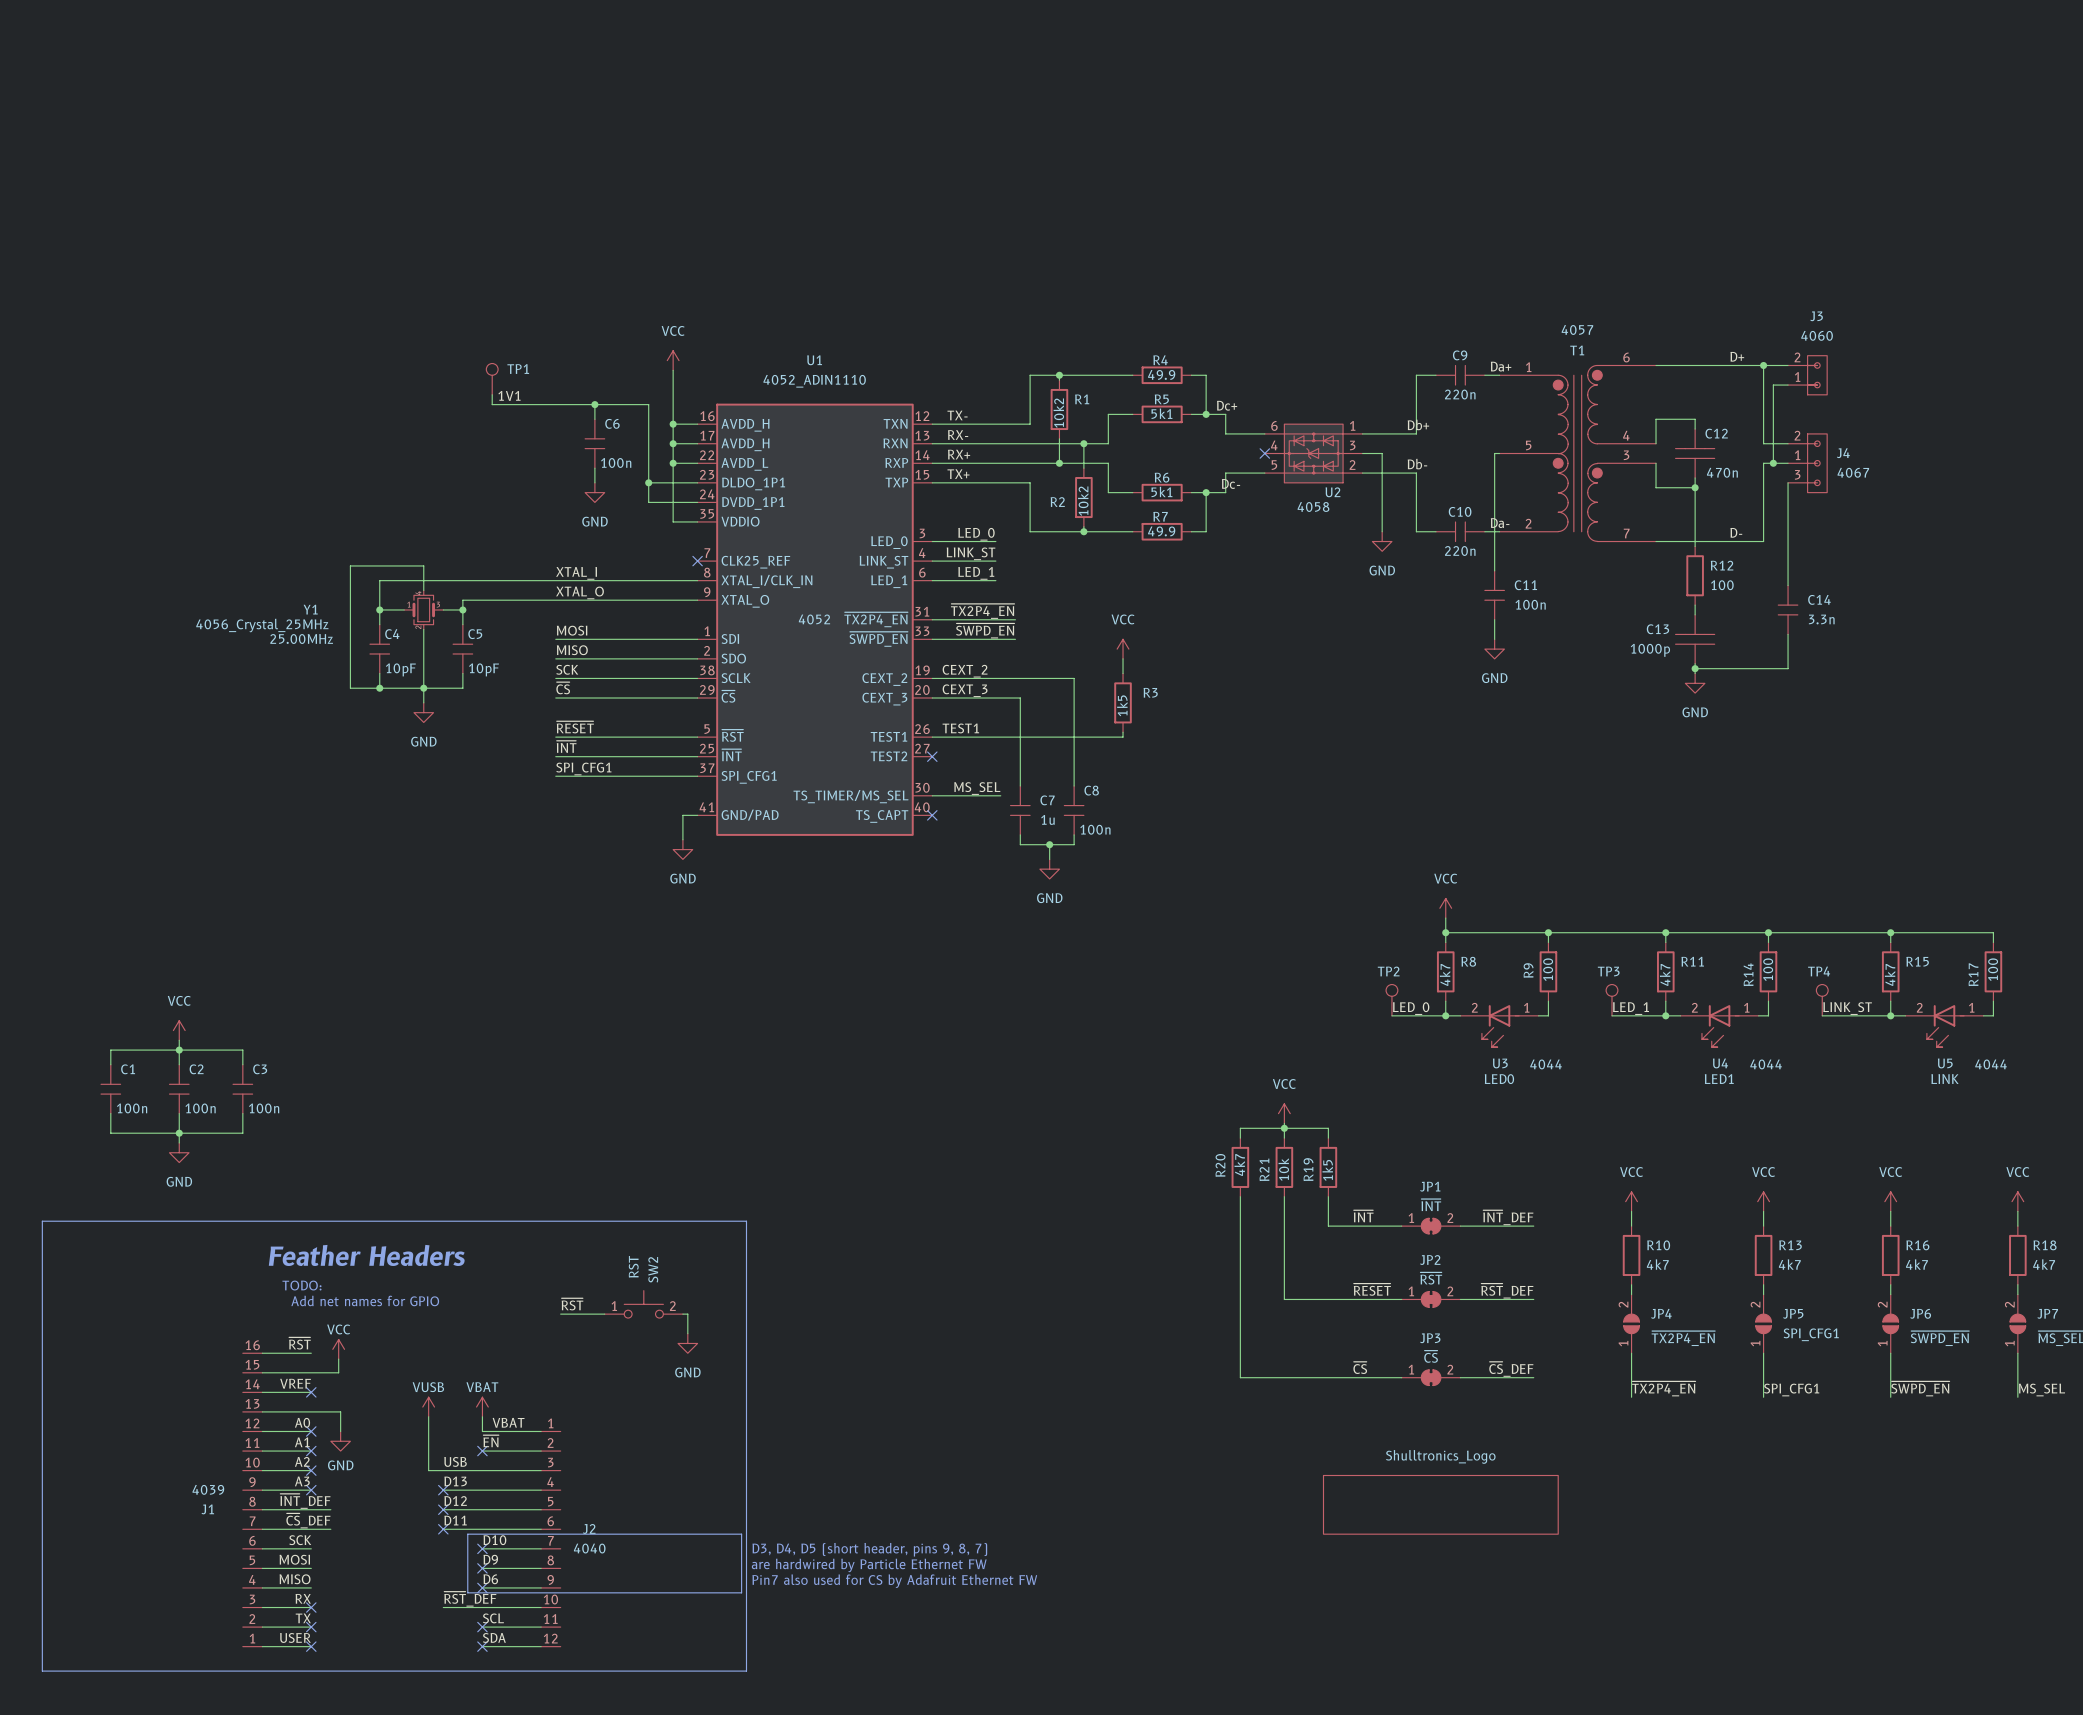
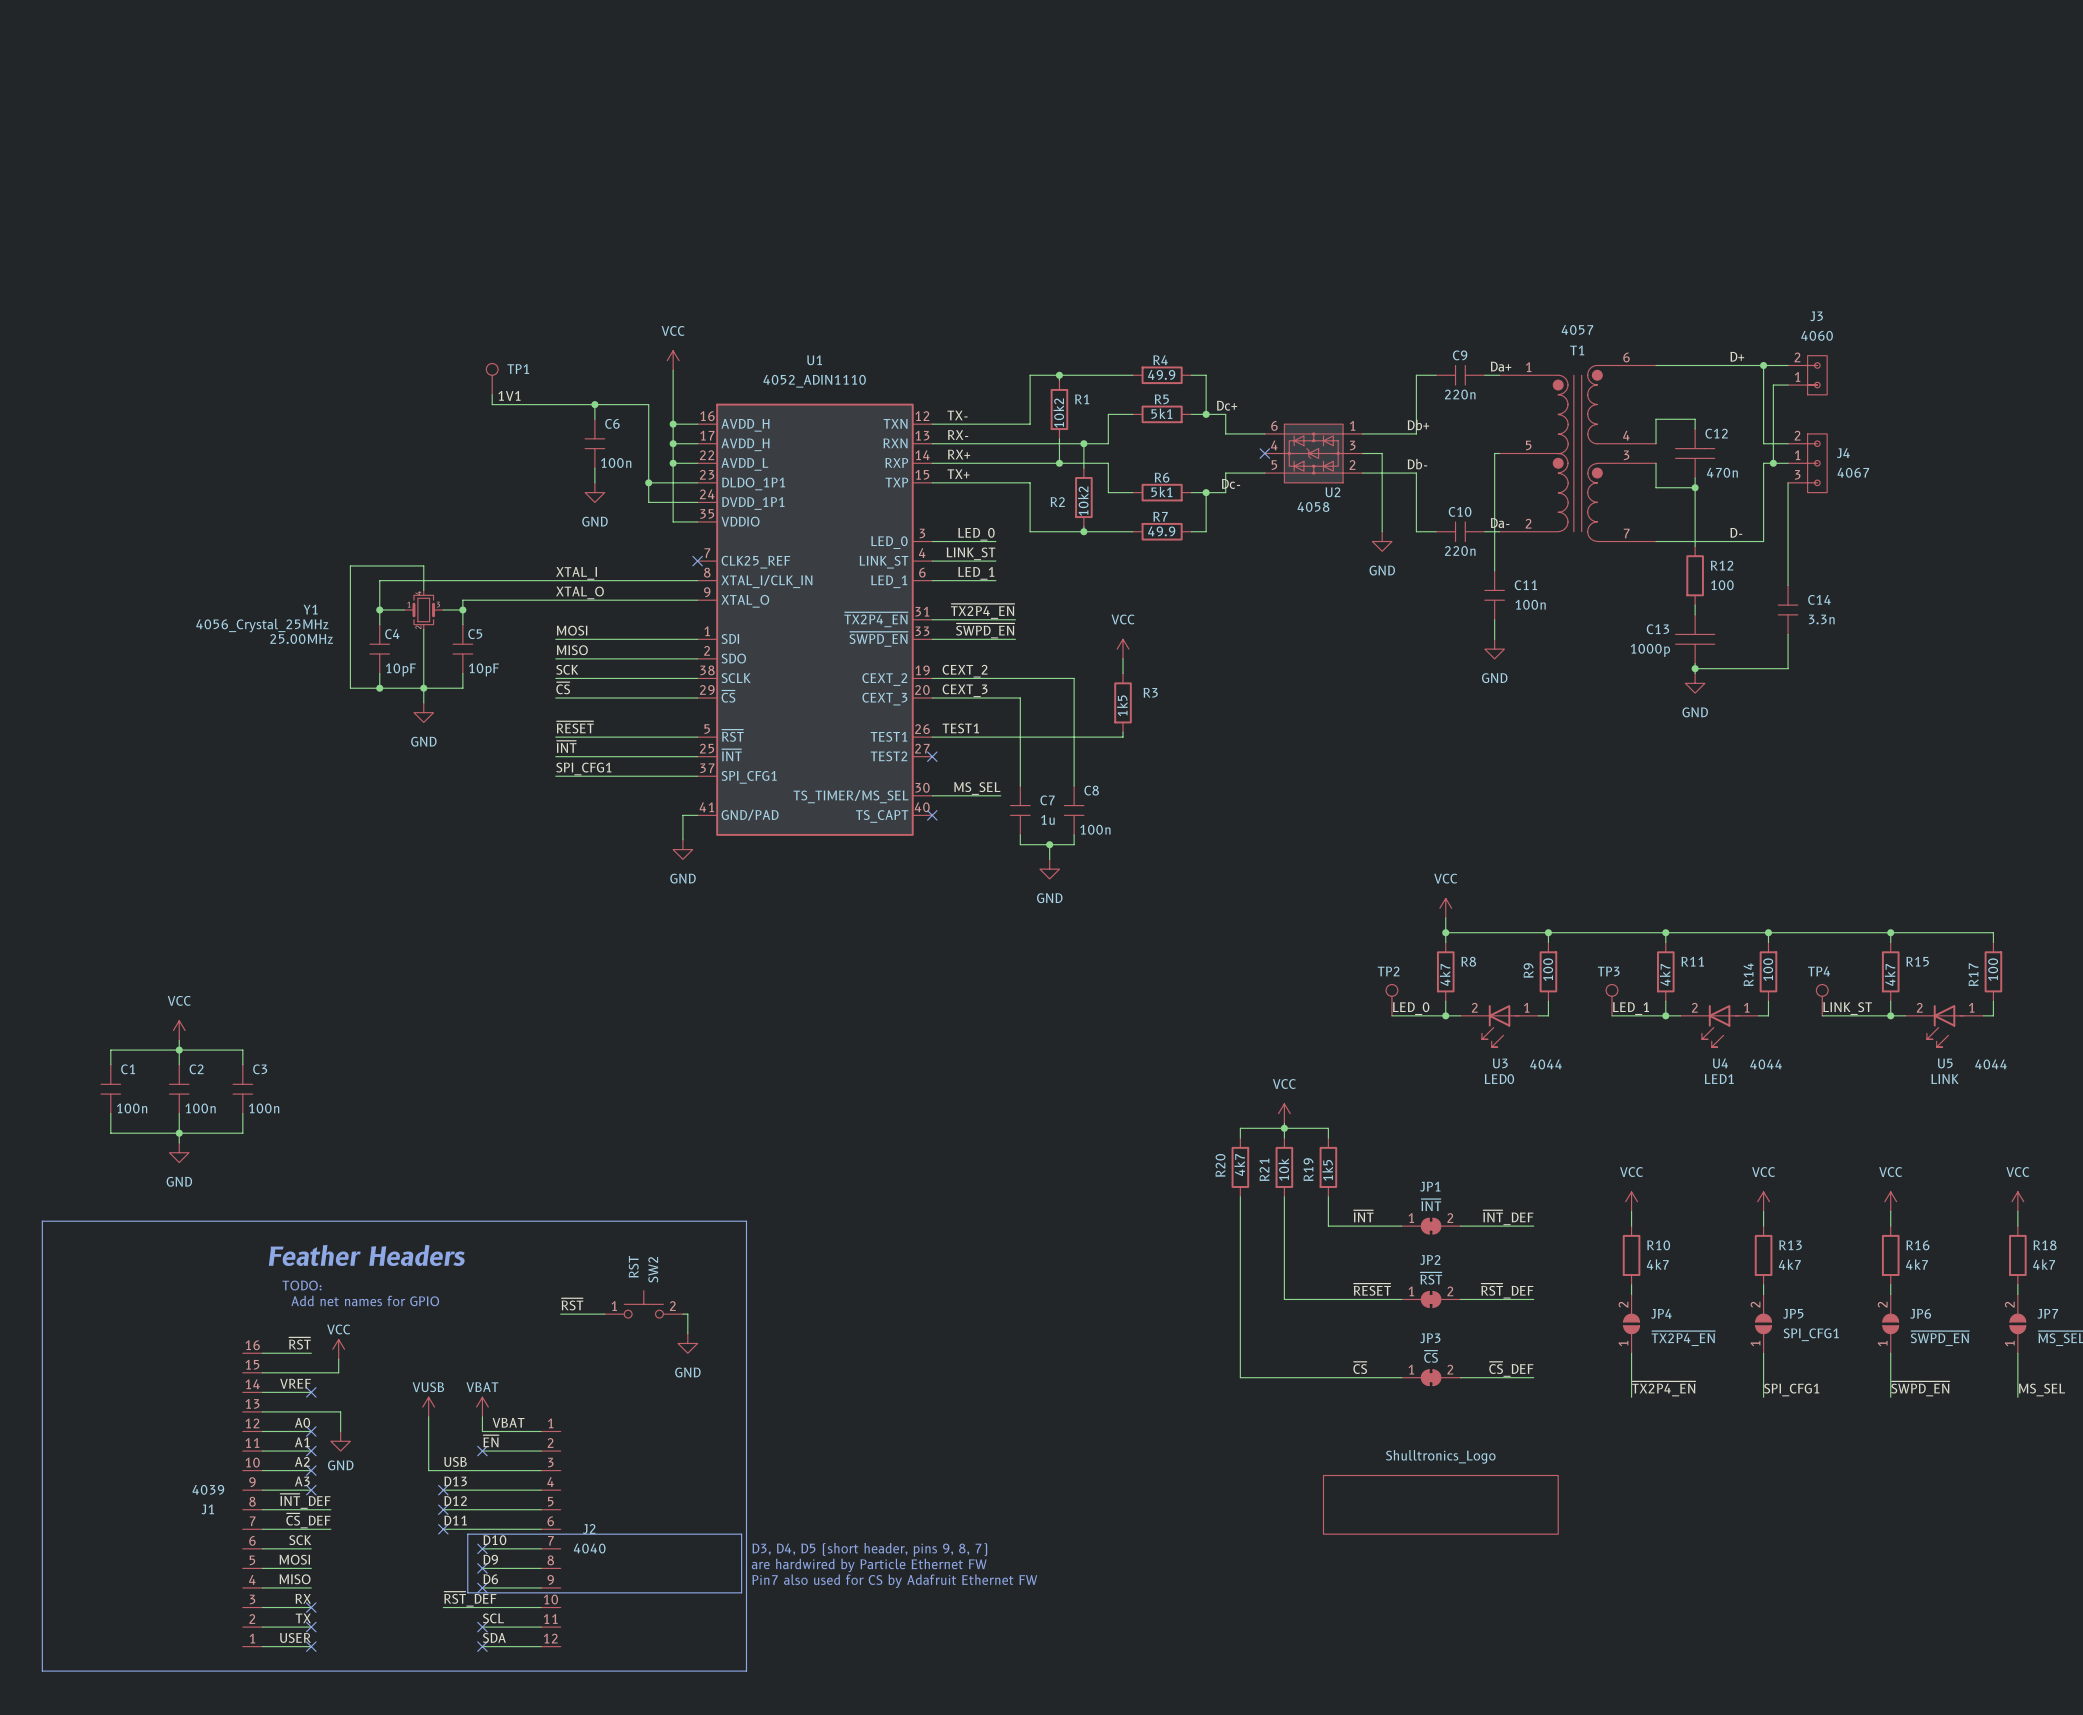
U1 text: 4052 (814, 619) -> none

